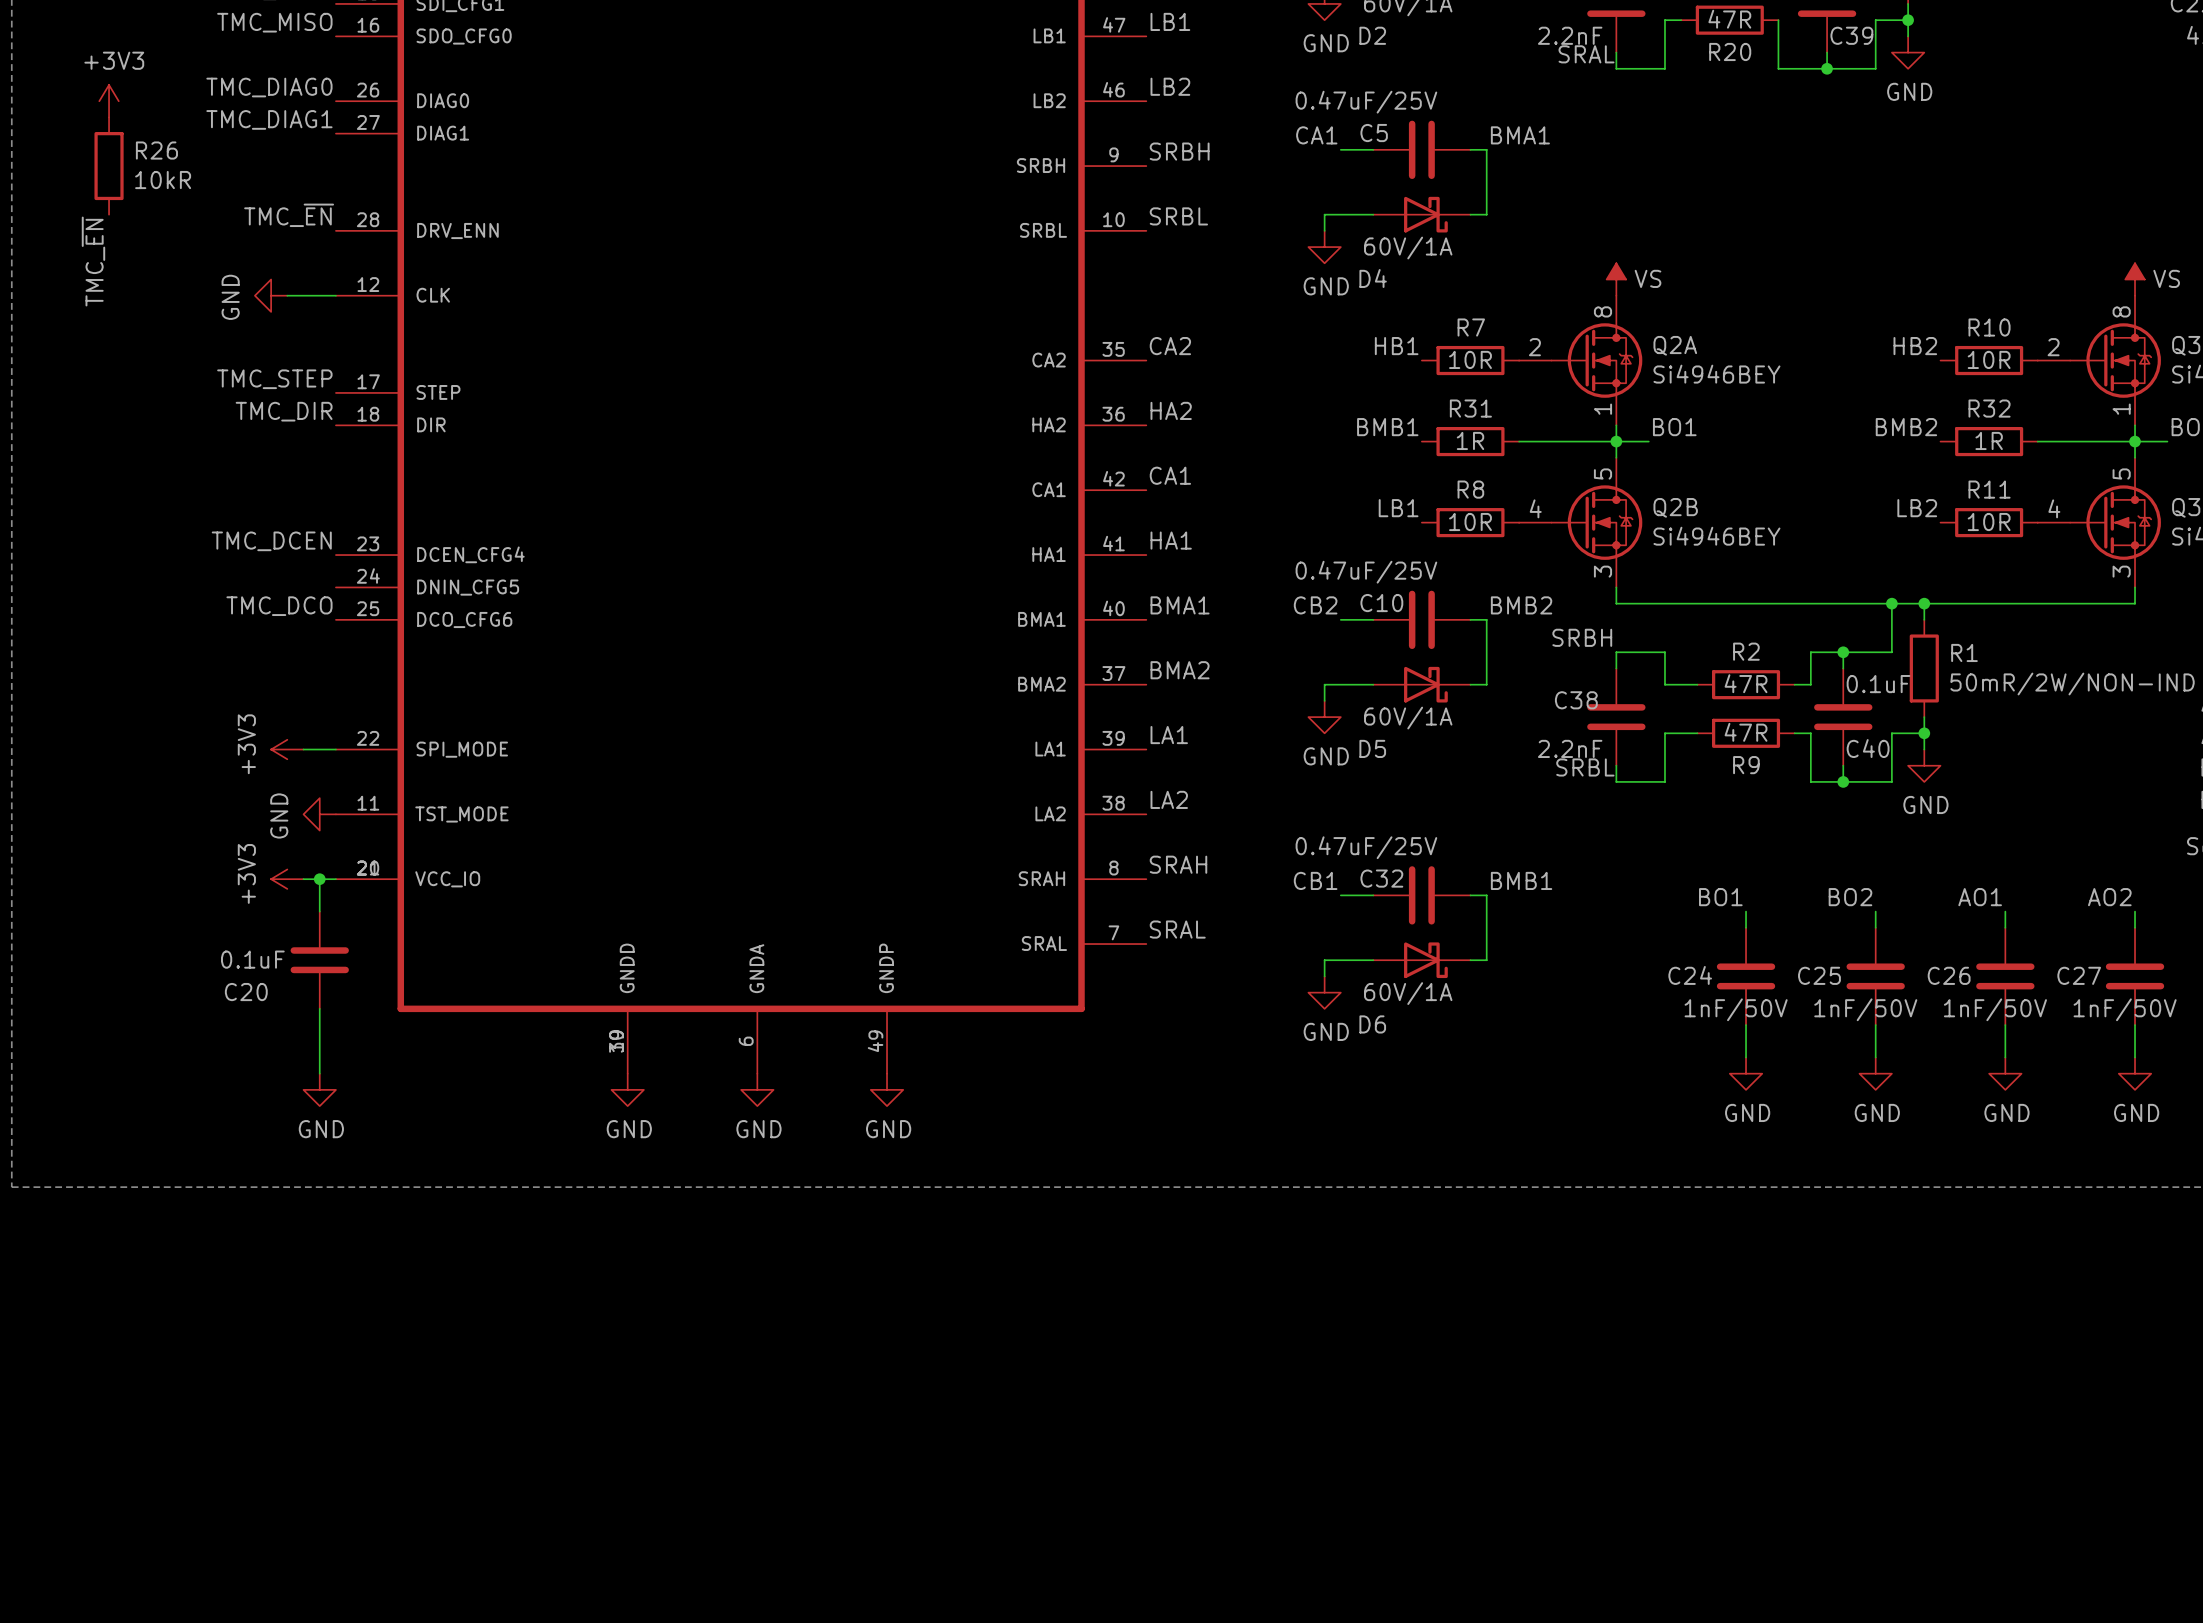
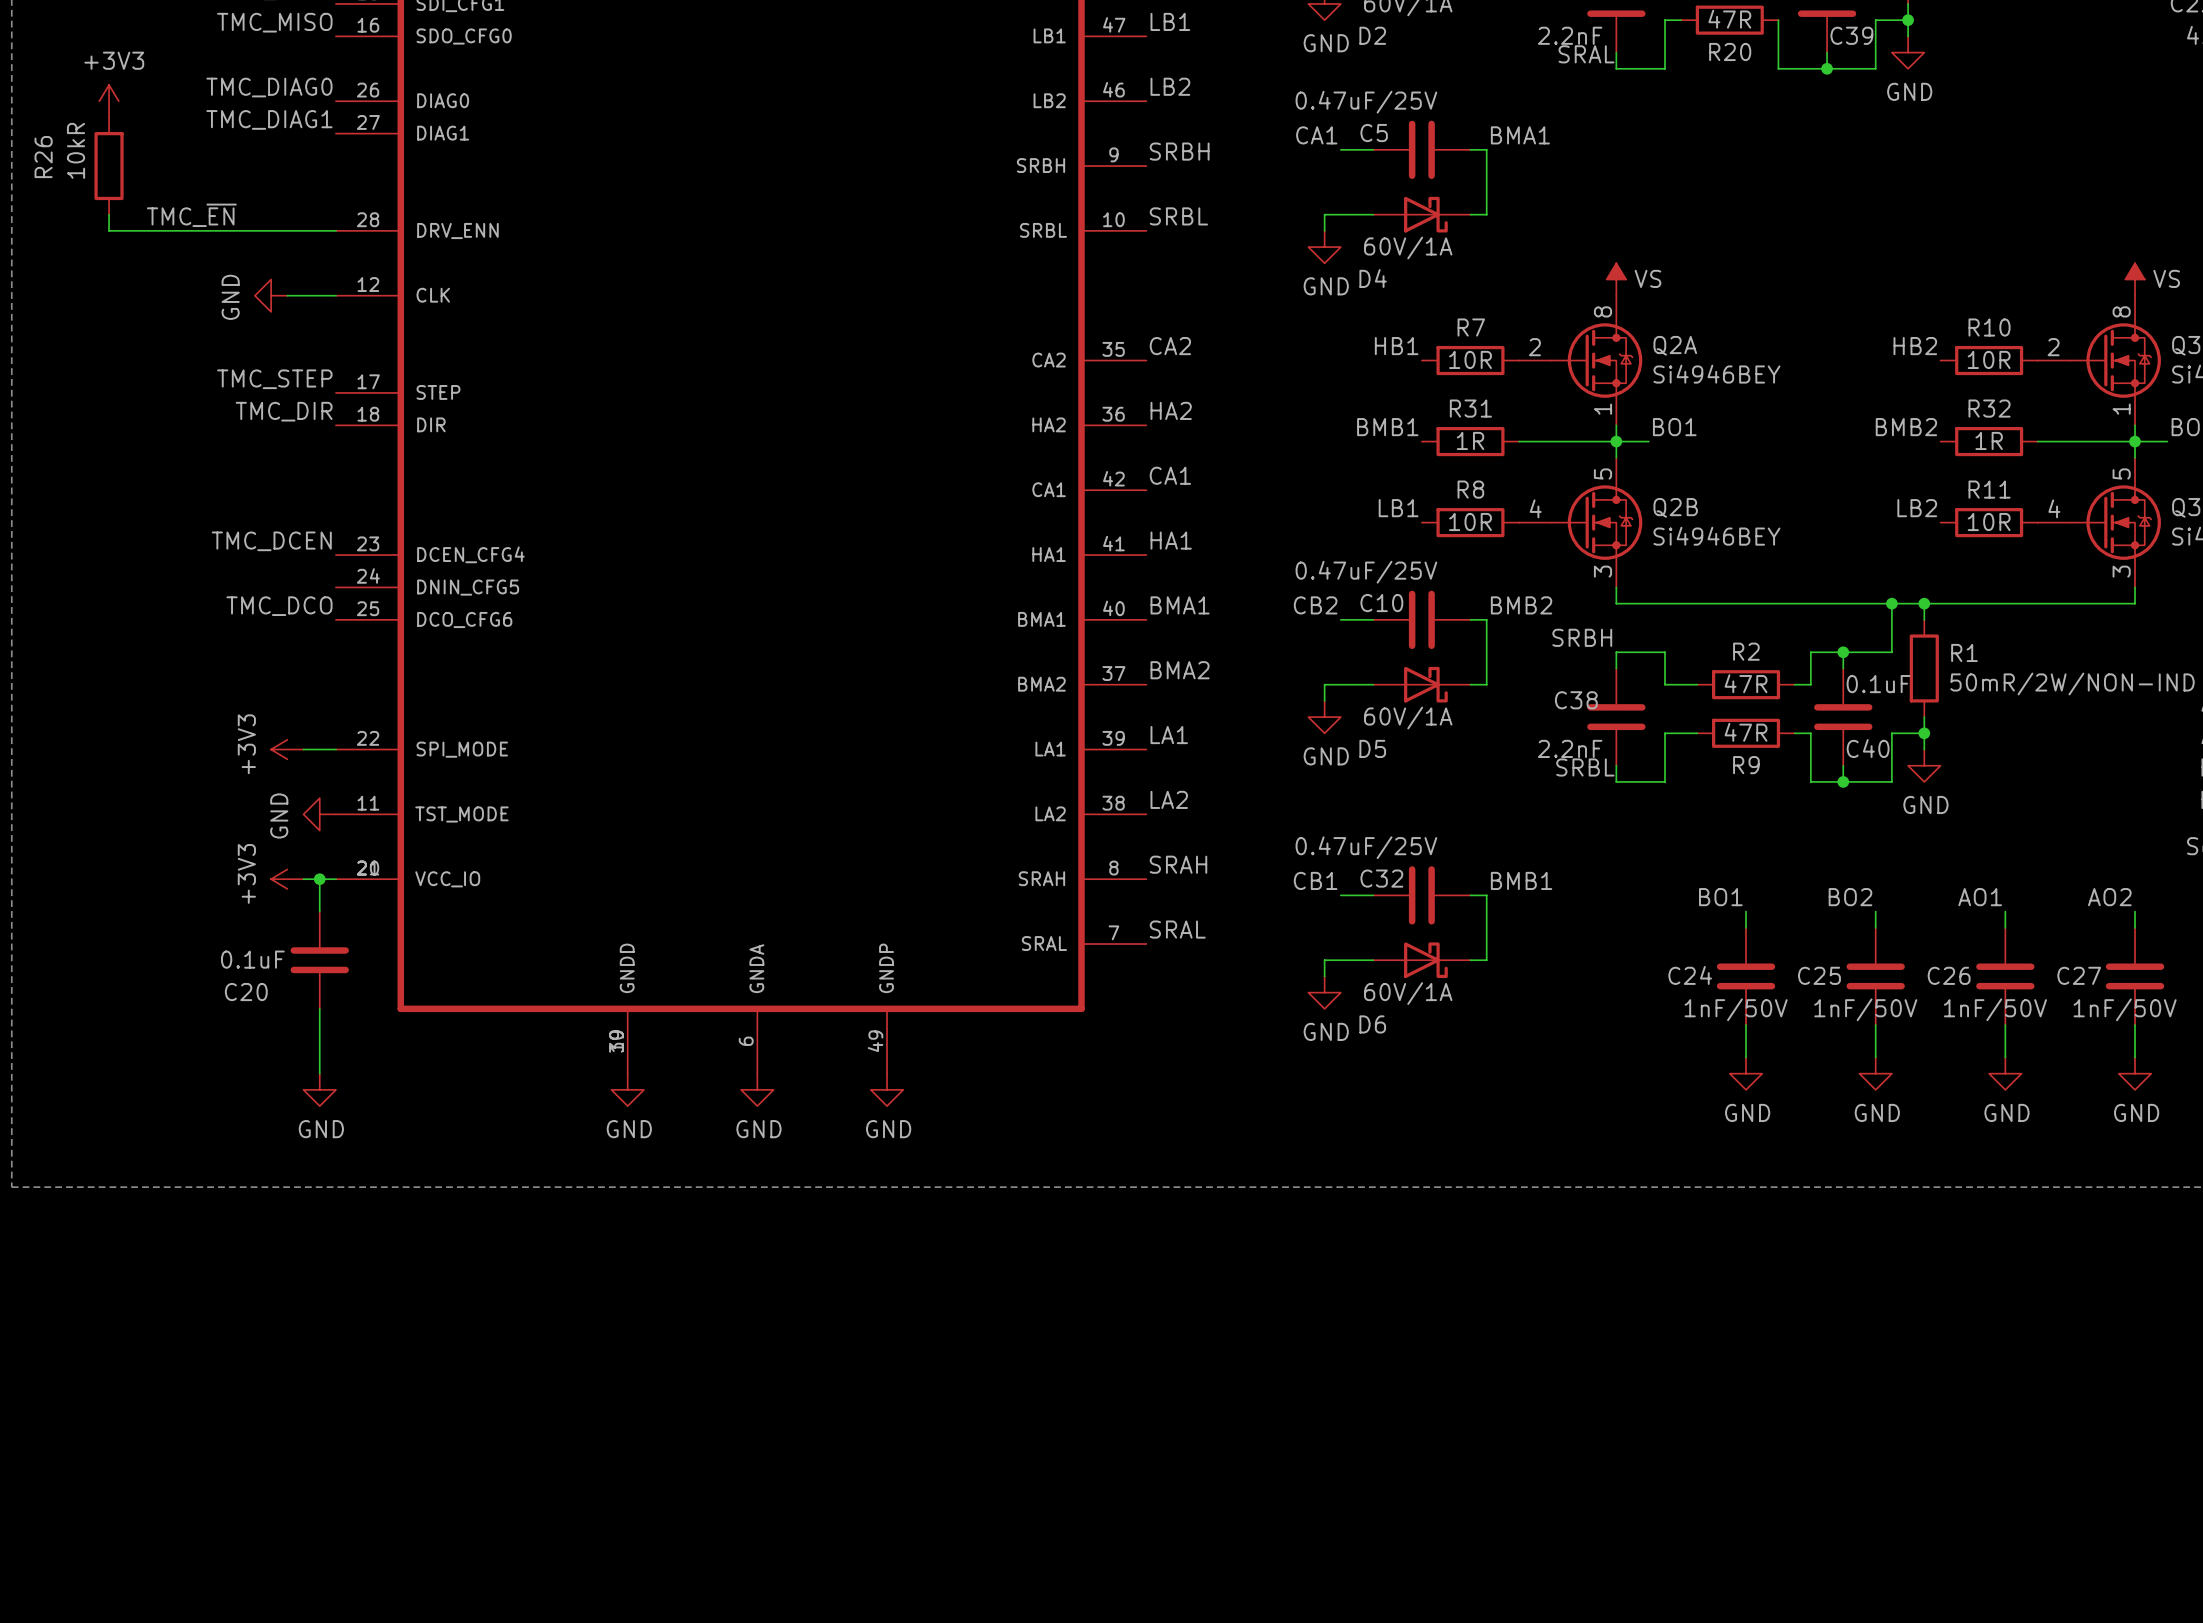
R26 name rotation: 0° (156, 150) -> 90° counterclockwise (43, 157)
R26 name position: R26 (156, 150) -> R26 (43, 157)
R26 value rotation: 0° (163, 180) -> 90° counterclockwise (76, 150)
R26 value position: 10kR (163, 180) -> 10kR (76, 150)
wire: none -> (109, 214) (109, 230) (335, 230)
label: none -> TMC_~{EN} (191, 215)
label: TMC_~{EN} (289, 215) -> none
label: TMC_~{EN} (93, 261) -> none

